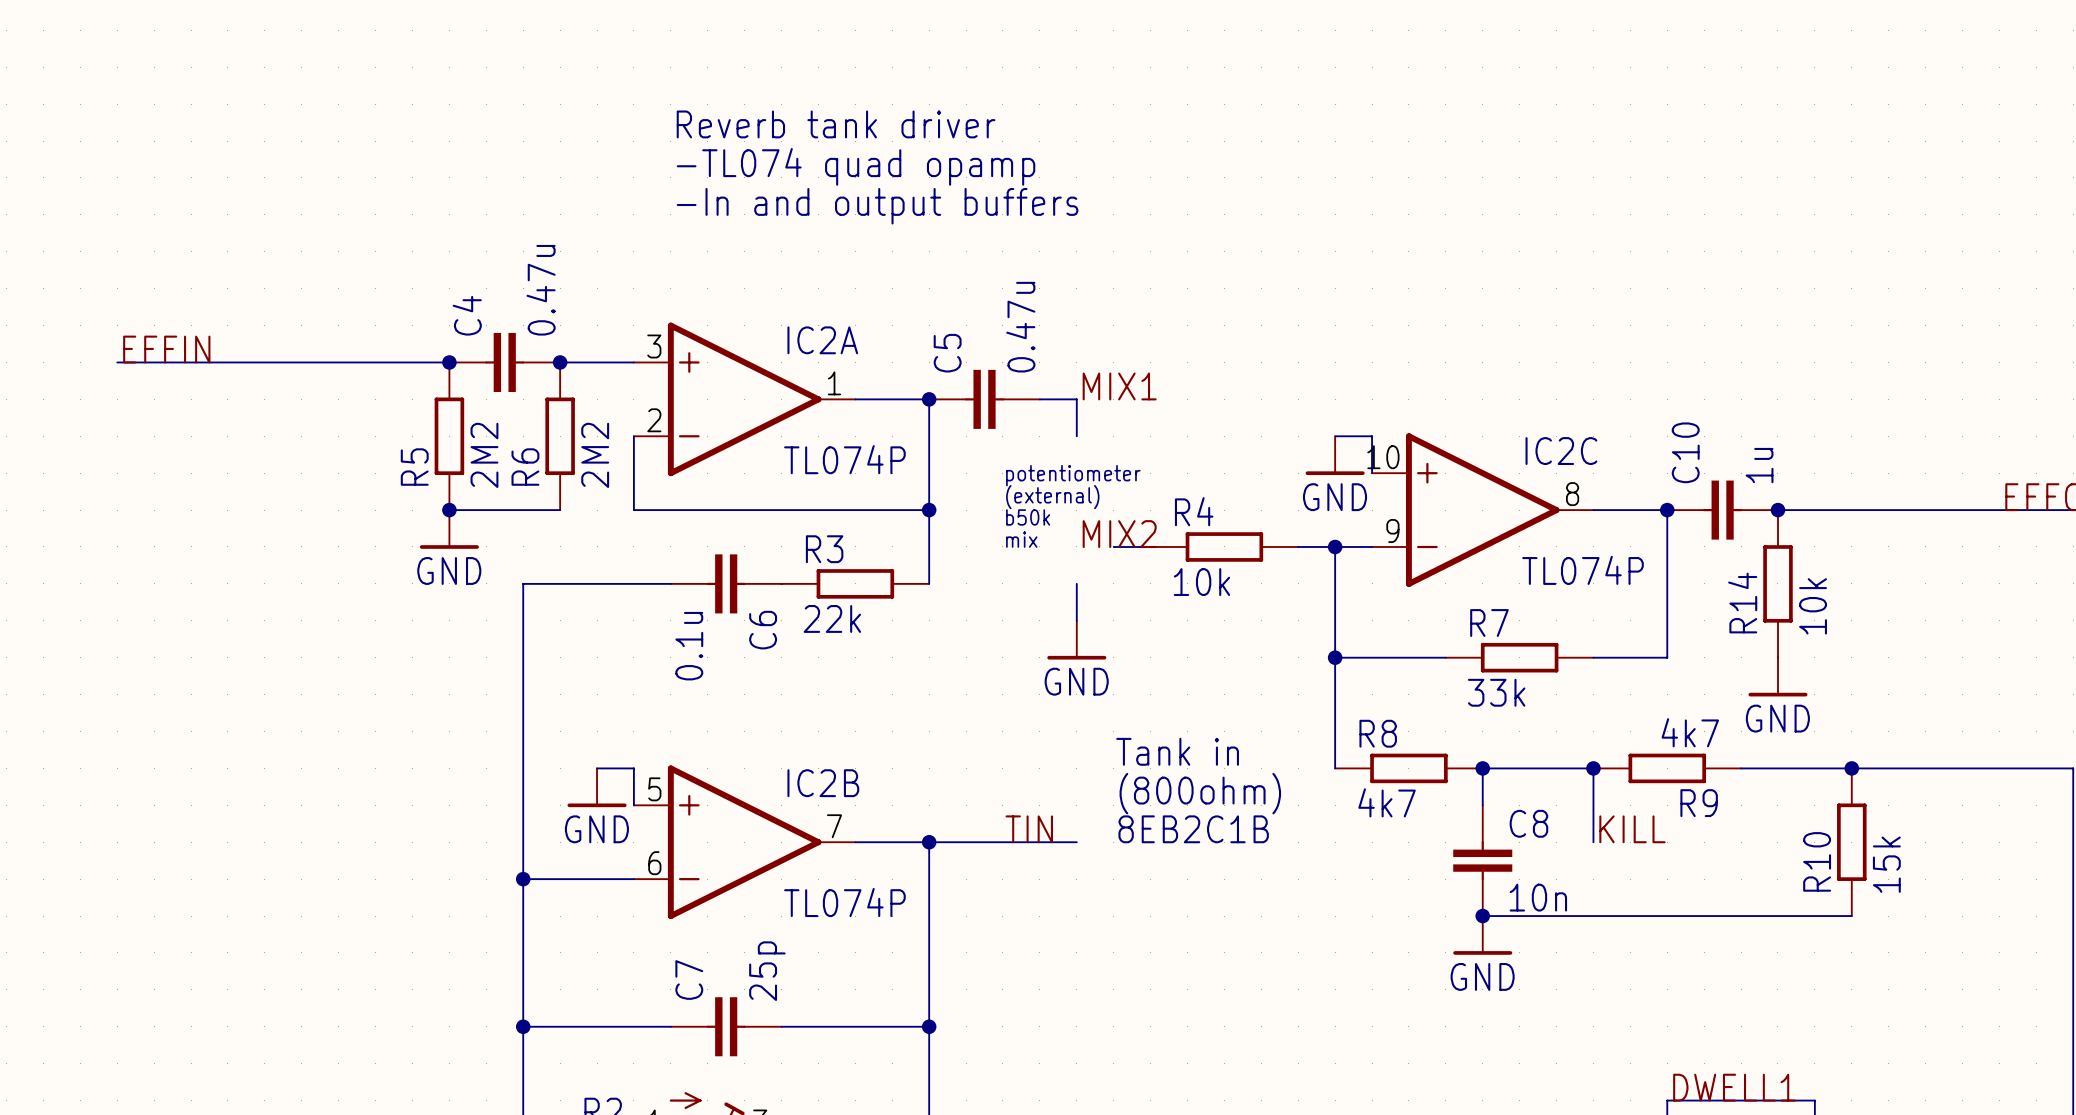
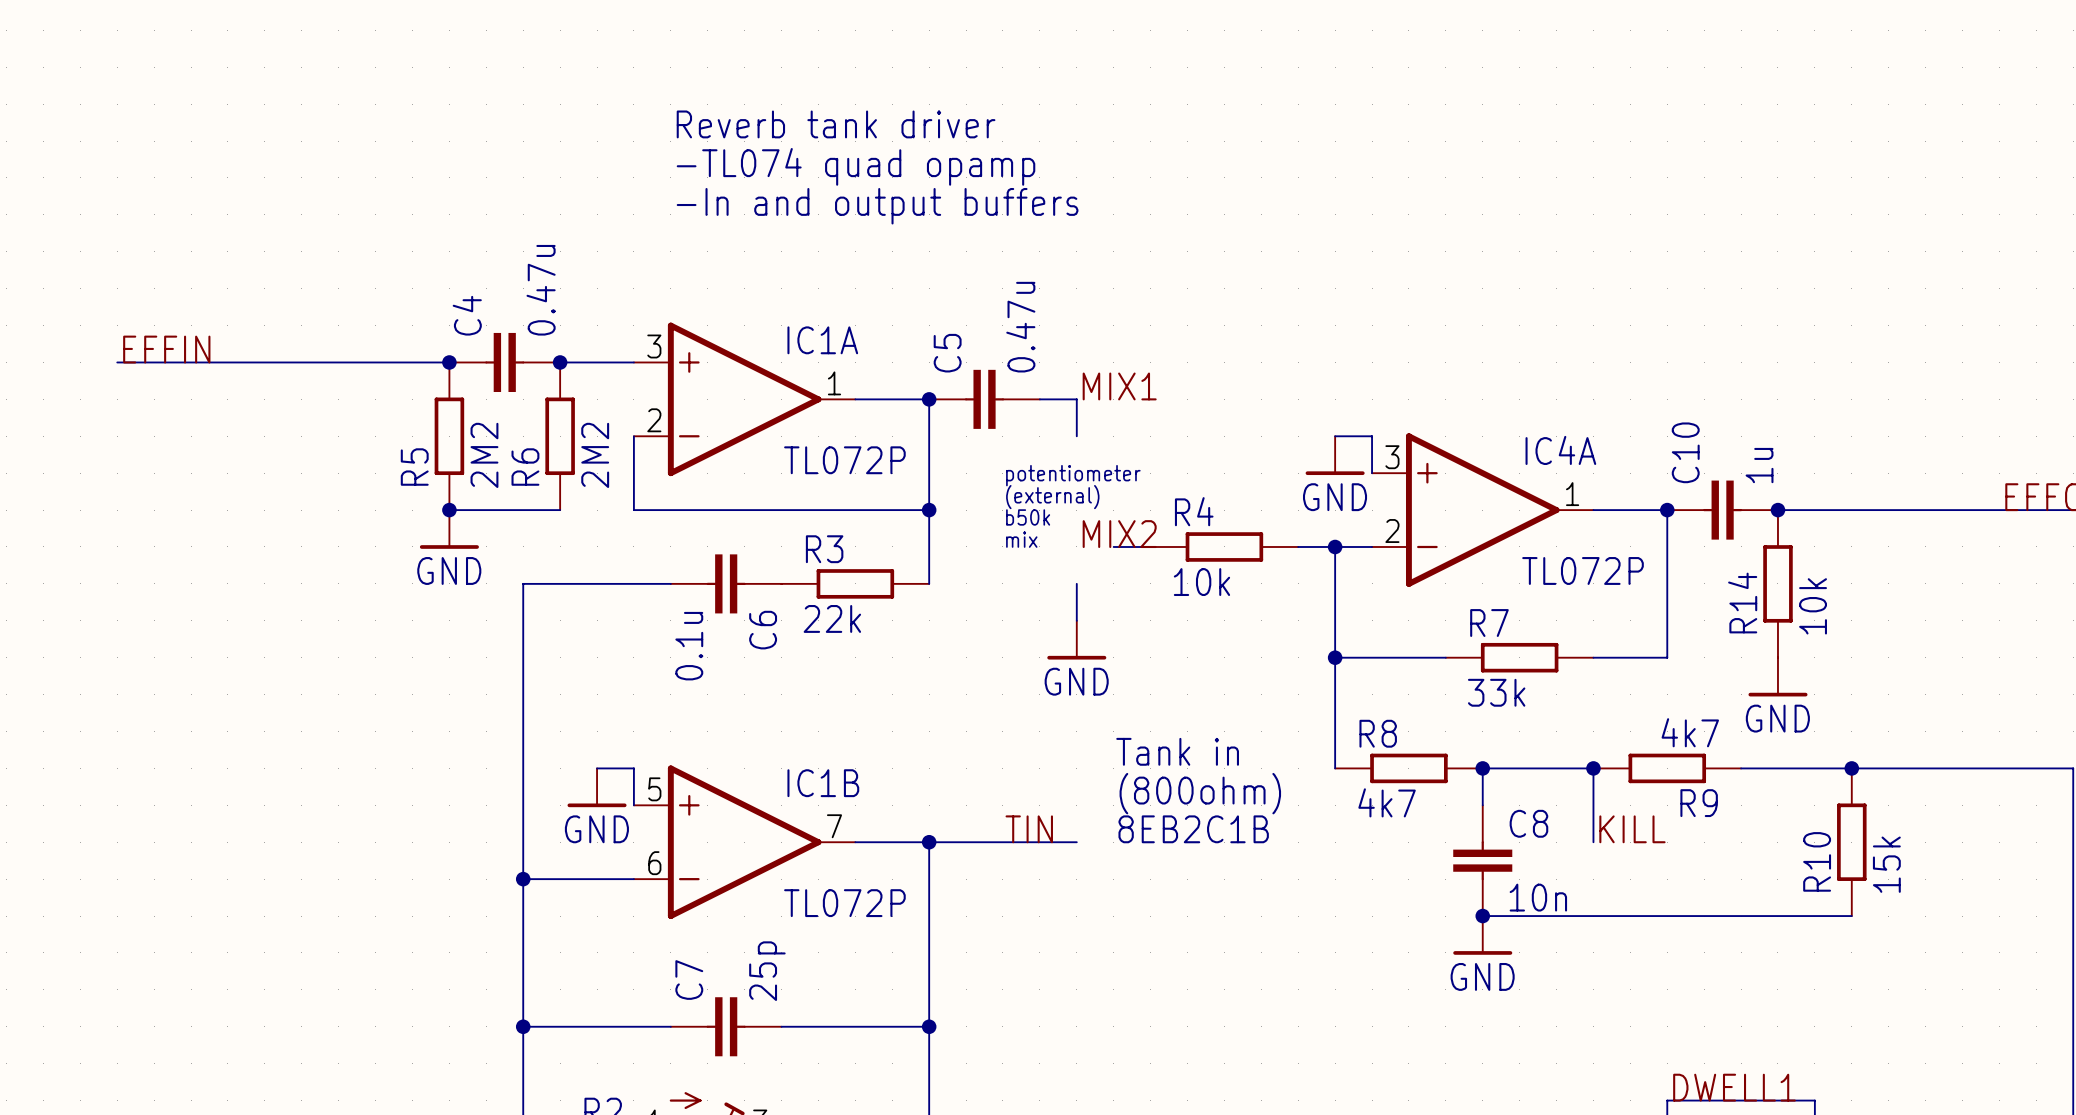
IC2A name: IC2A (822, 340) -> IC1A (822, 340)
IC2C name: IC2C (1561, 451) -> IC4A (1560, 450)
IC2C pin number: 10 (1383, 457) -> 3 (1392, 457)
IC2A value: TL074P (844, 459) -> TL072P (844, 460)
IC2C pin number: 8 (1572, 494) -> 1 (1572, 494)
IC2C pin number: 9 (1392, 531) -> 2 (1392, 531)
IC2C value: TL074P (1583, 570) -> TL072P (1583, 570)
IC2B name: IC2B (823, 783) -> IC1B (823, 783)
IC2B value: TL074P (844, 902) -> TL072P (844, 903)

